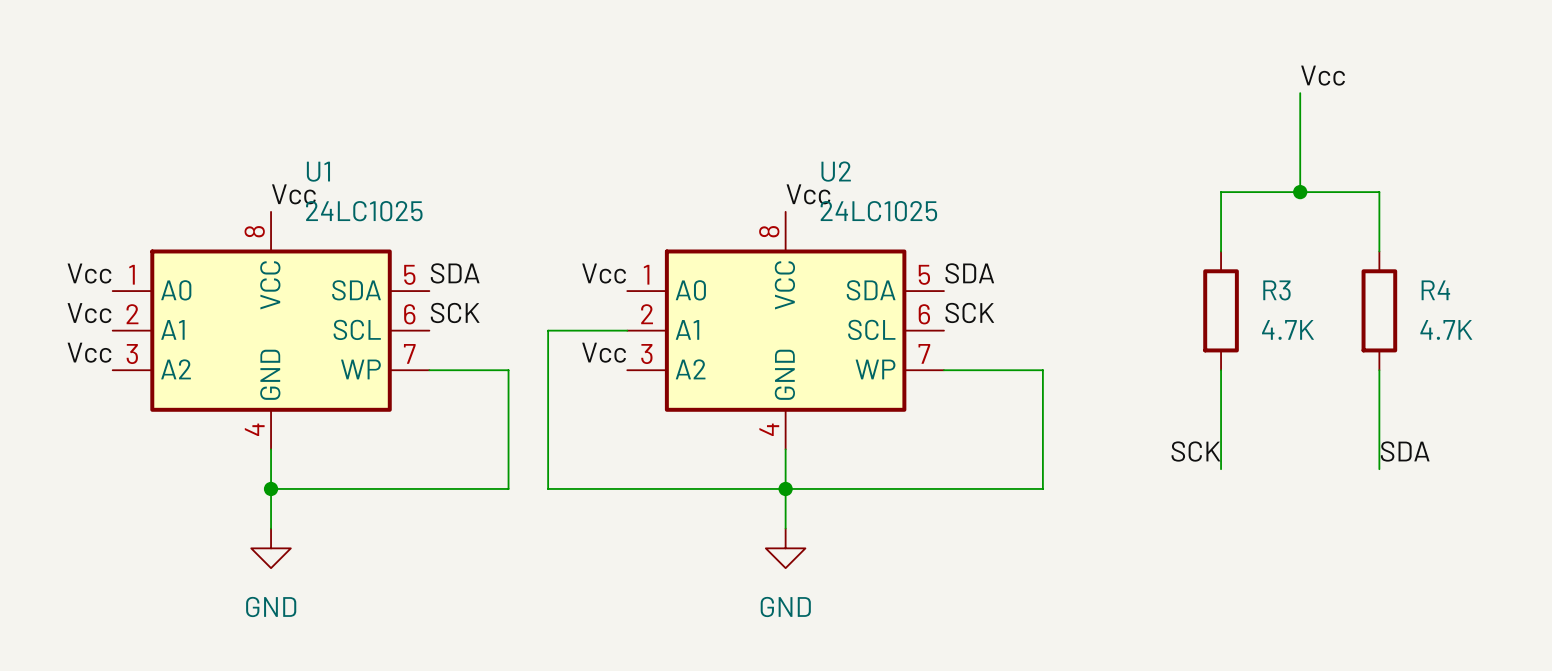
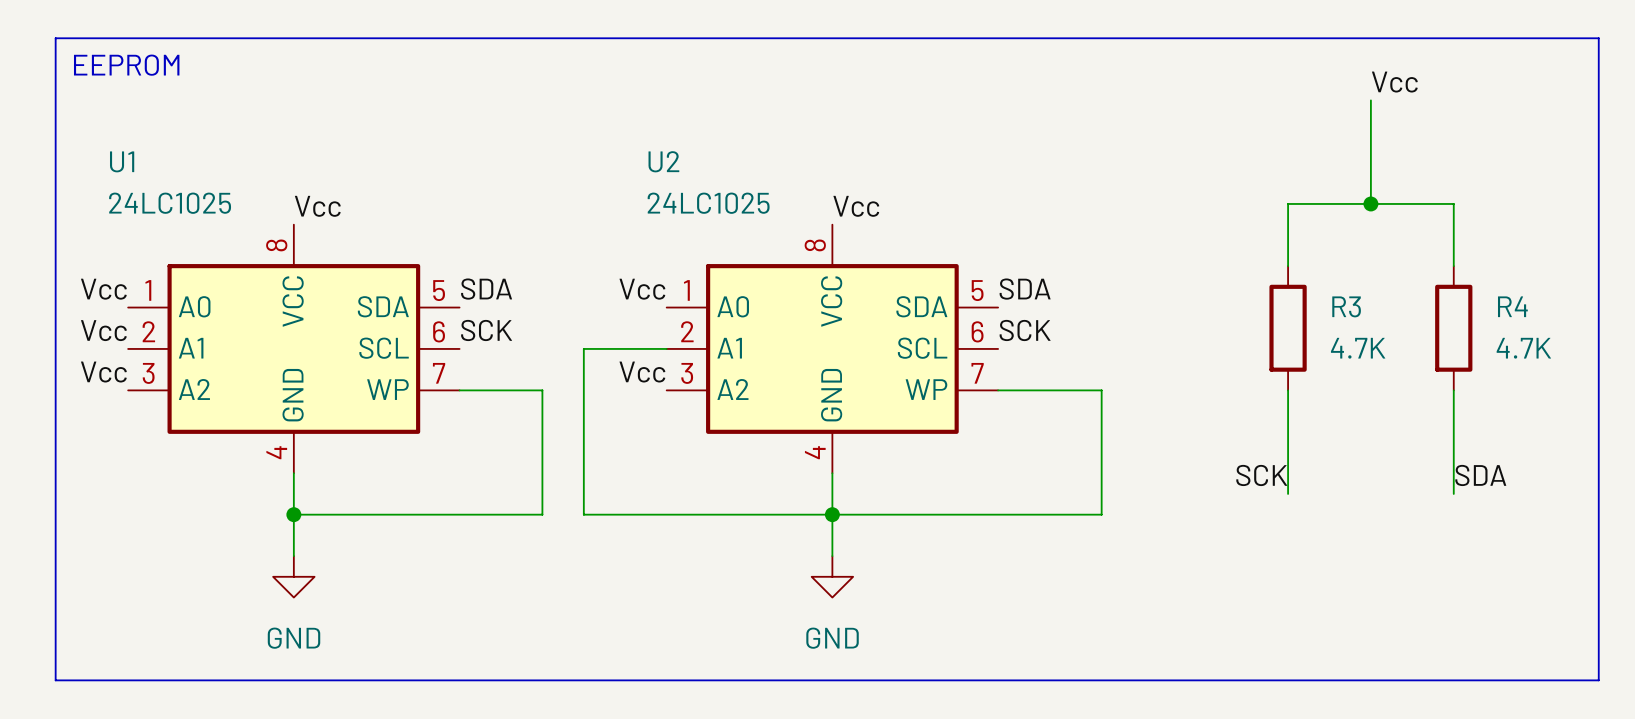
line: none -> (55, 38) (1598, 38) (1598, 680) (55, 680) (55, 38)
text: none -> EEPROM (126, 65)
U1 name position: U1 (318, 171) -> U1 (122, 161)
U2 name position: U2 (836, 171) -> U2 (663, 161)
U1 value position: 24LC1025 (364, 211) -> 24LC1025 (170, 203)
U2 value position: 24LC1025 (878, 211) -> 24LC1025 (708, 203)

